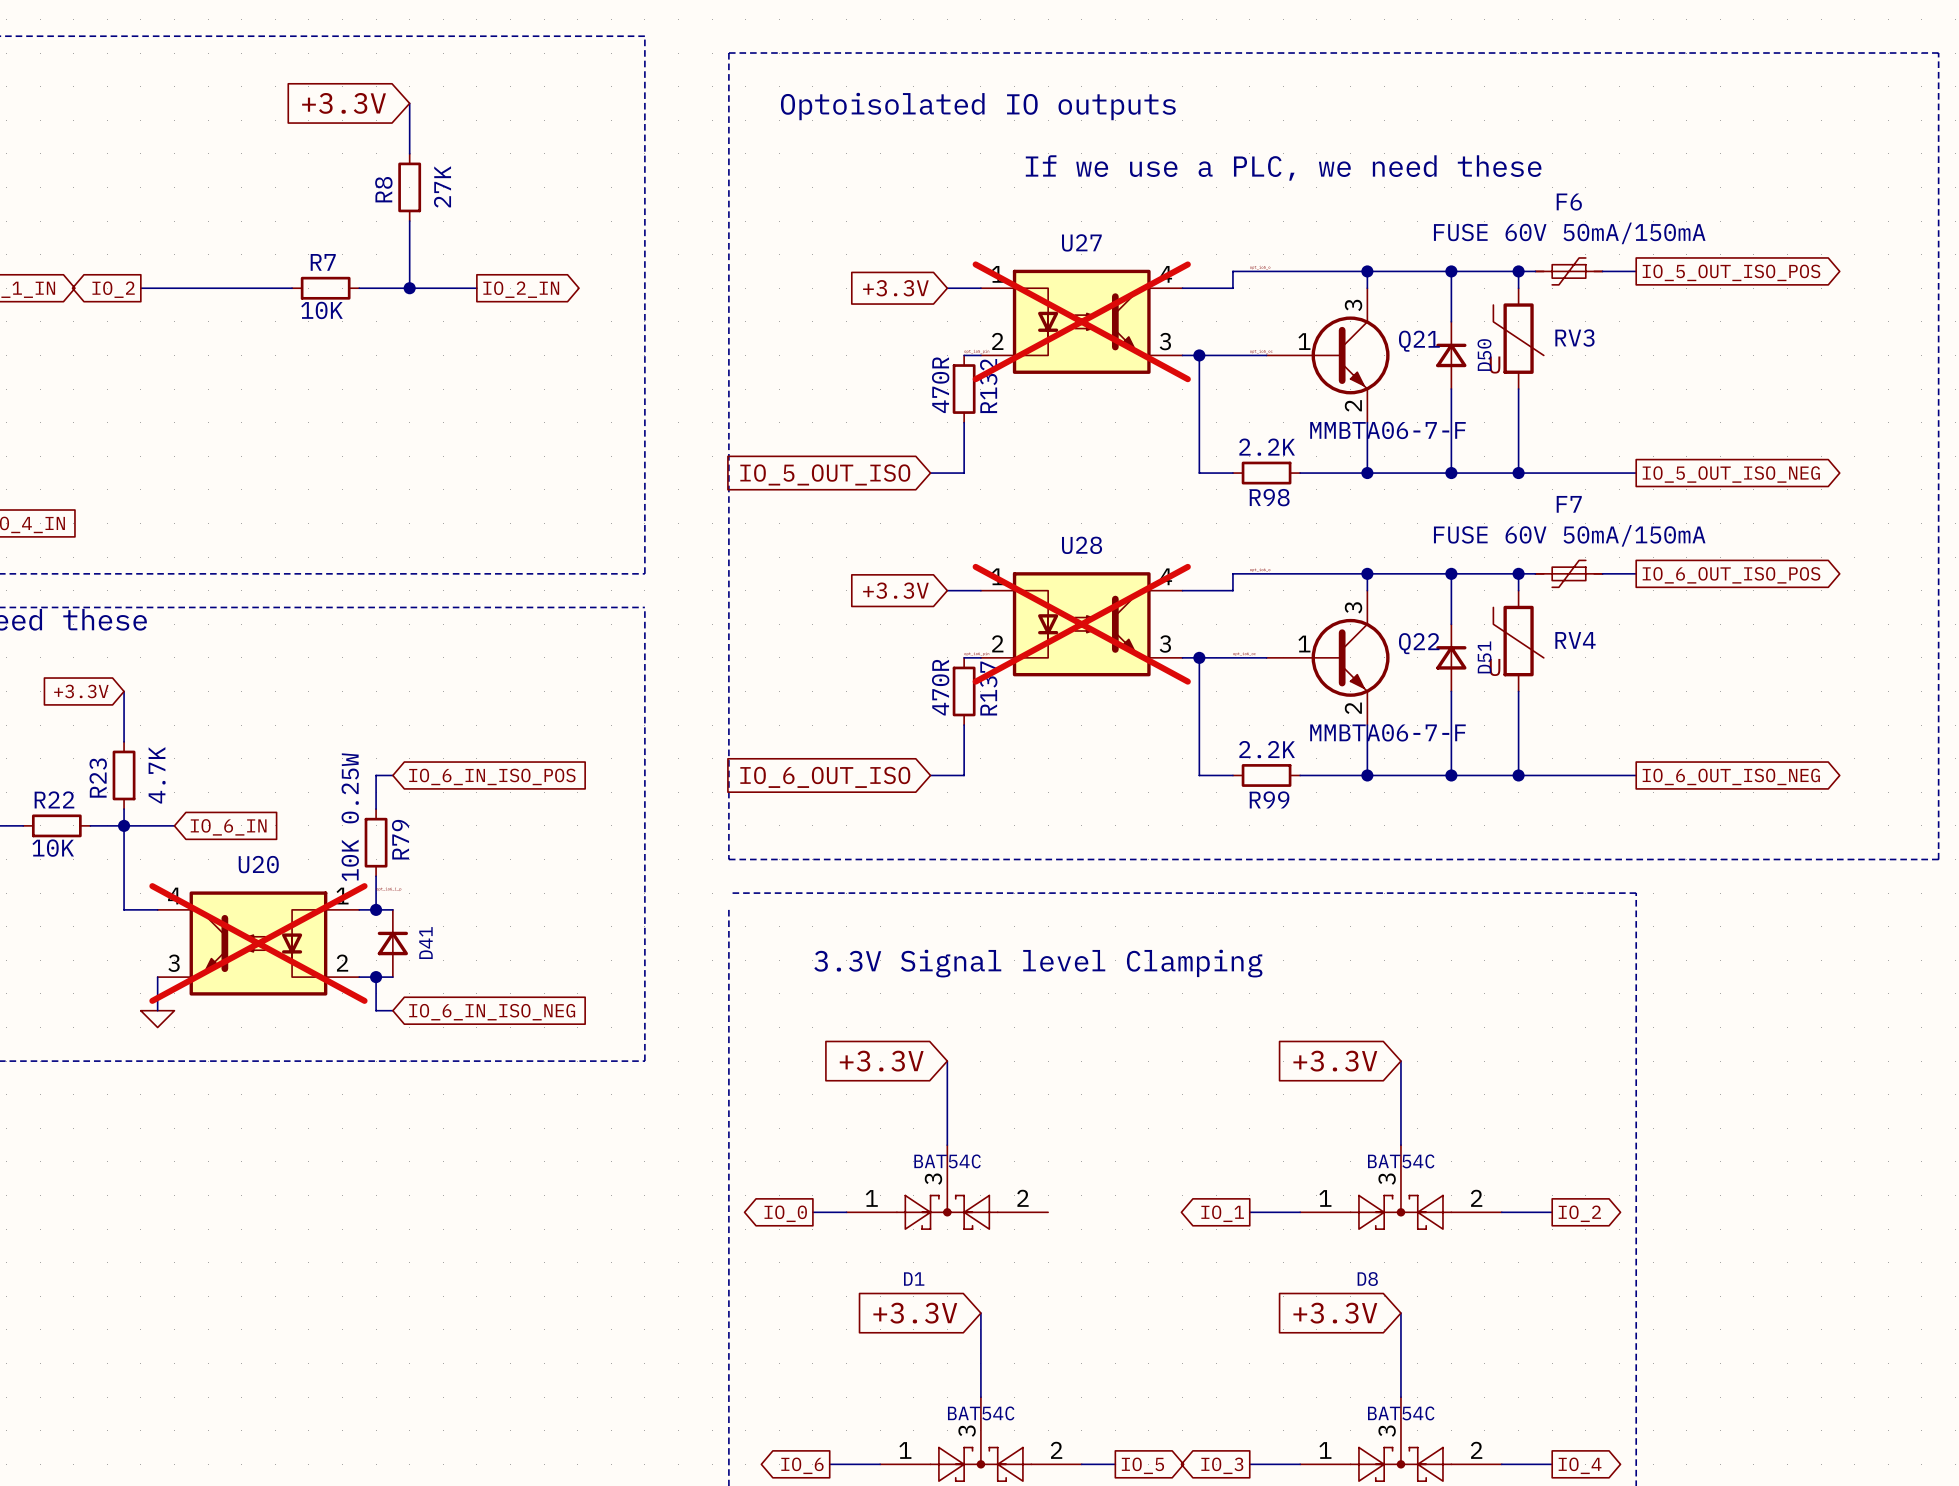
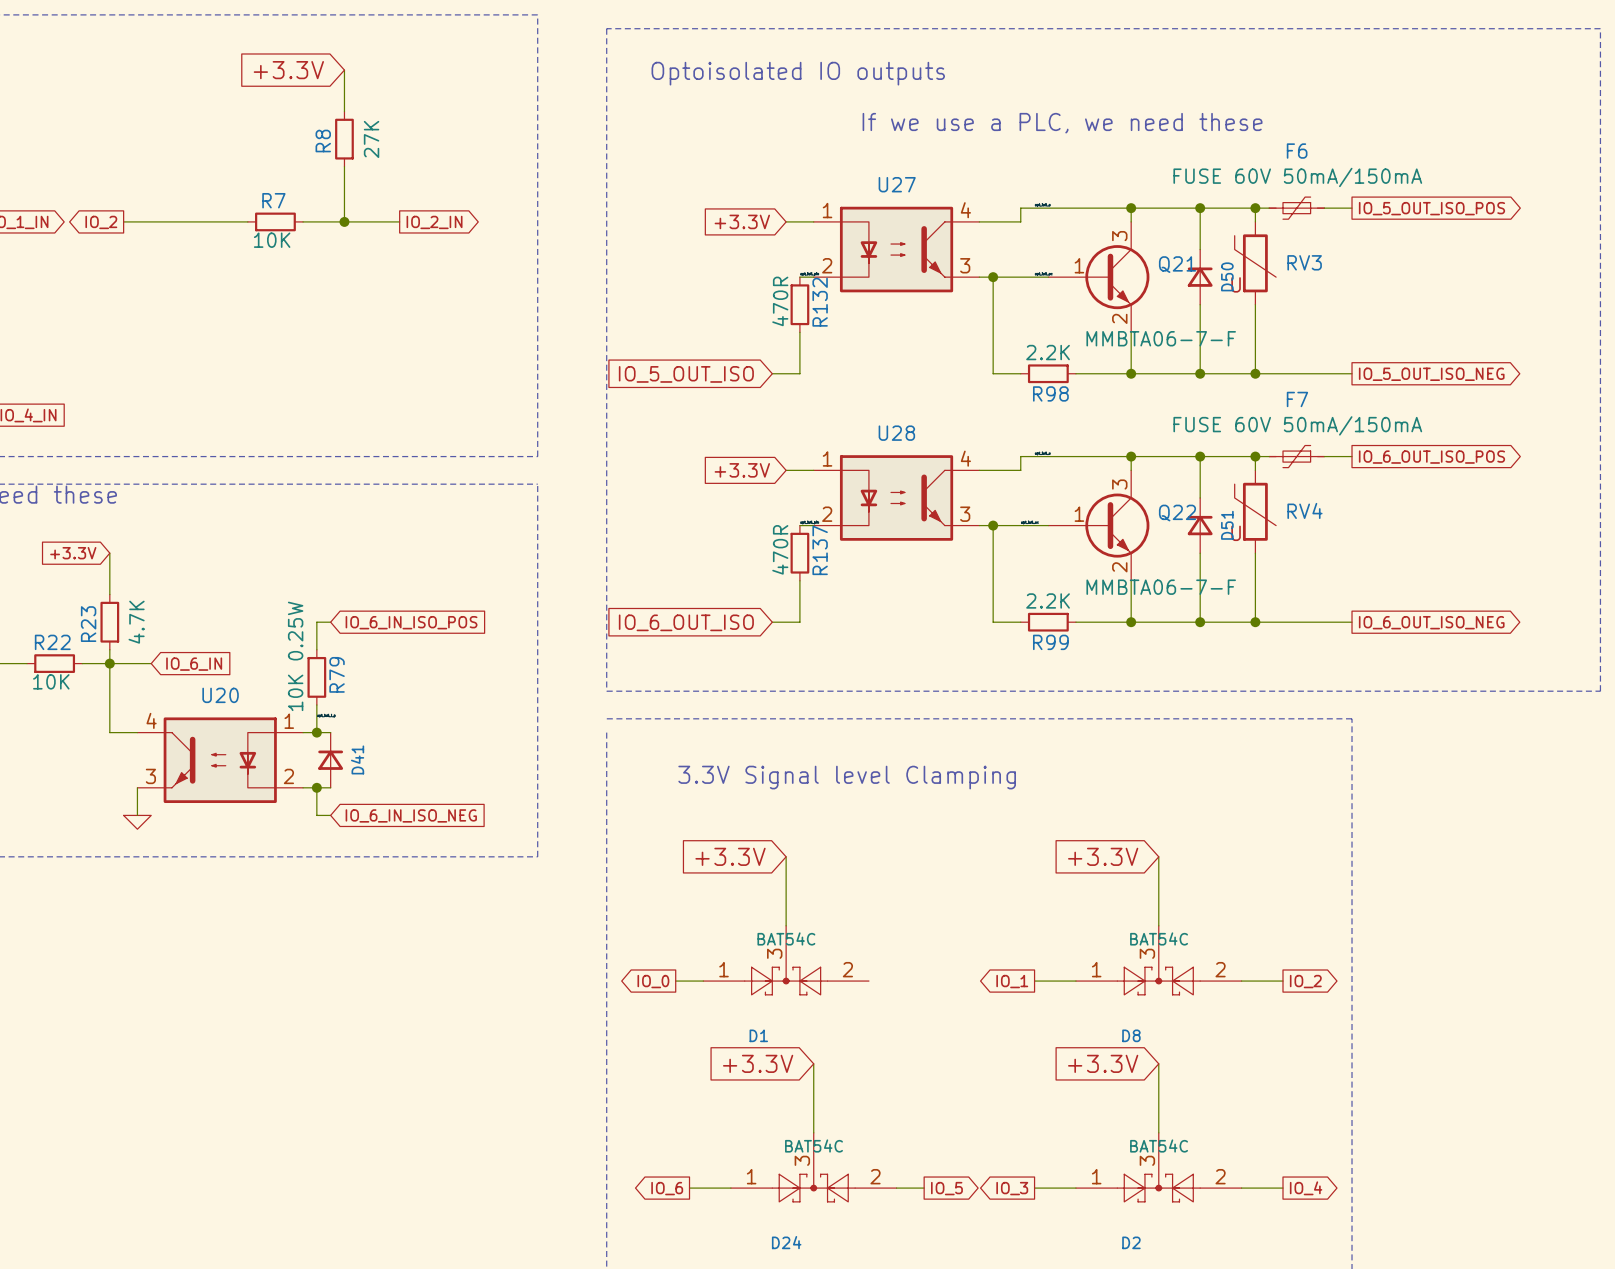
U27 do-not-place cross: (1081, 321) -> none
U28 do-not-place cross: (1081, 624) -> none
U20 do-not-place cross: (258, 943) -> none

